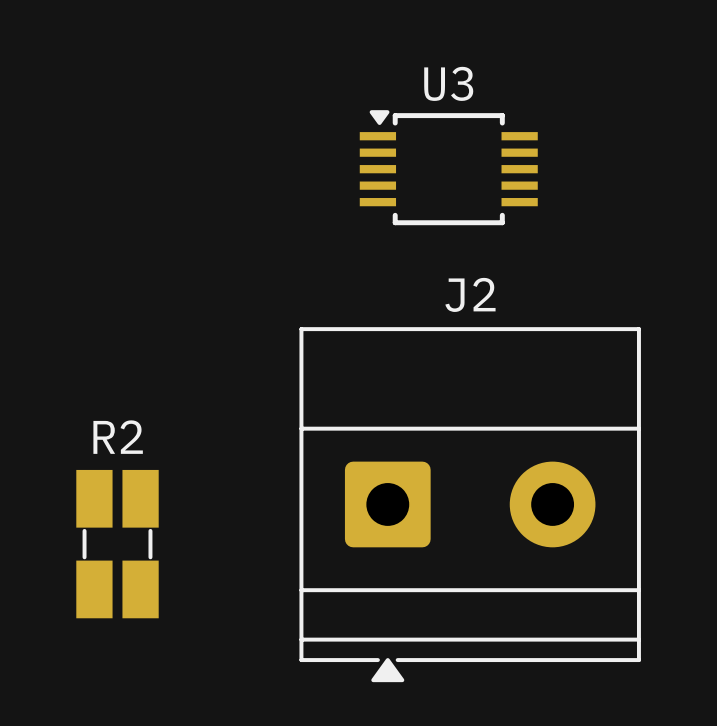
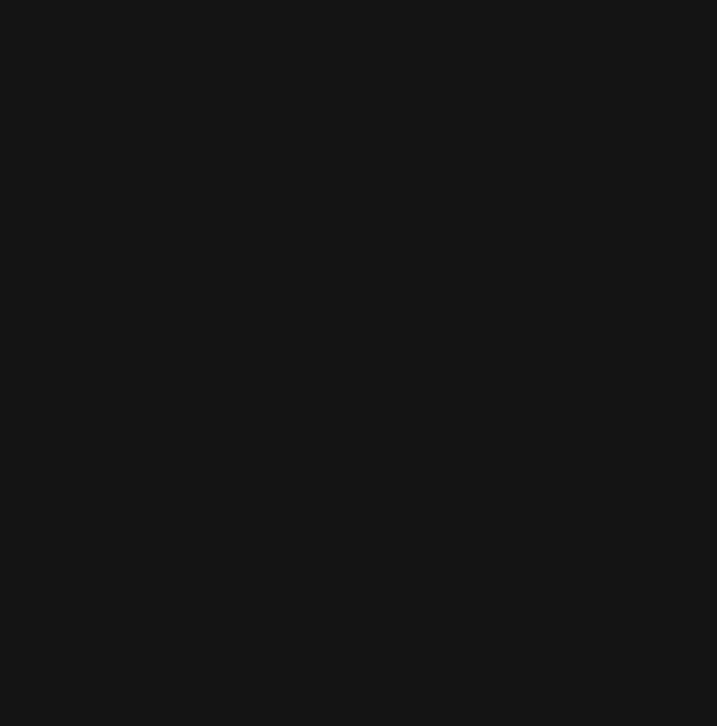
U3: (448, 167) -> none
J2: (470, 504) -> none
R2: (117, 544) -> none

